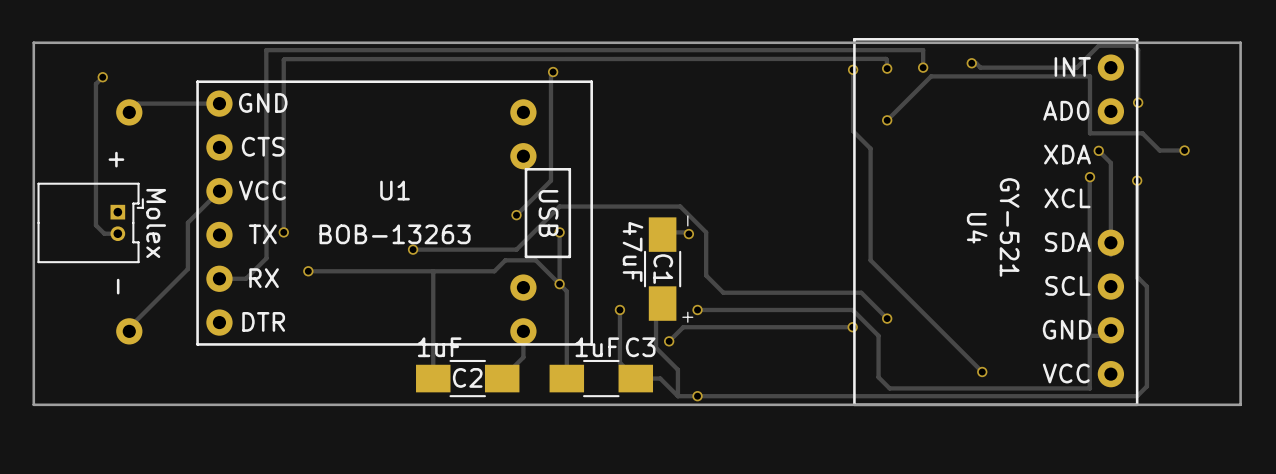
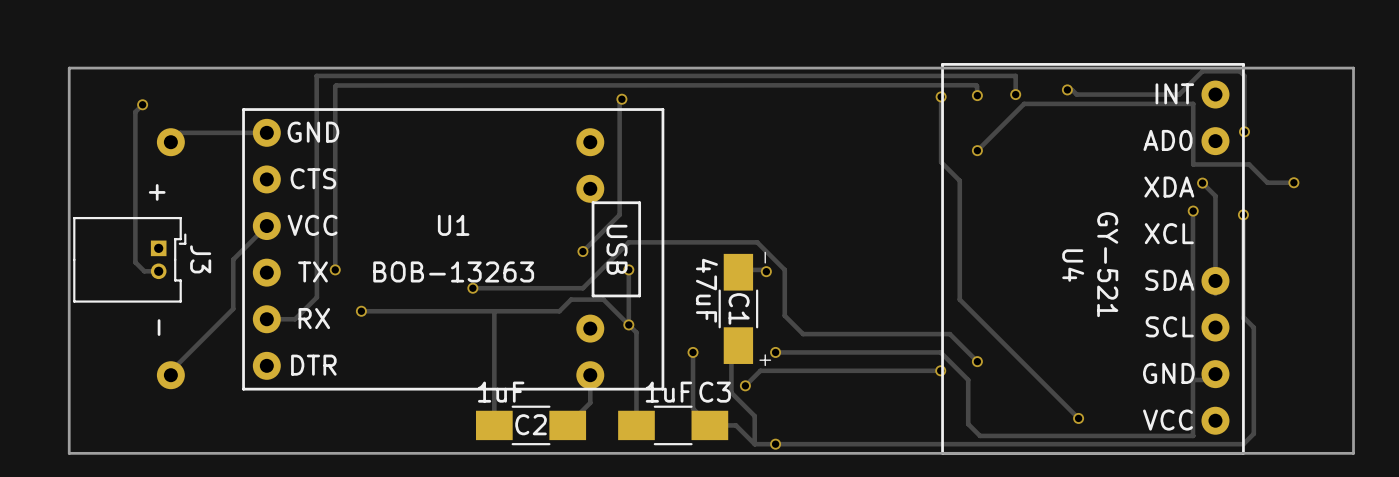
J3 name: none -> J3 (200, 259)
J3 value: Molex (156, 223) -> none

